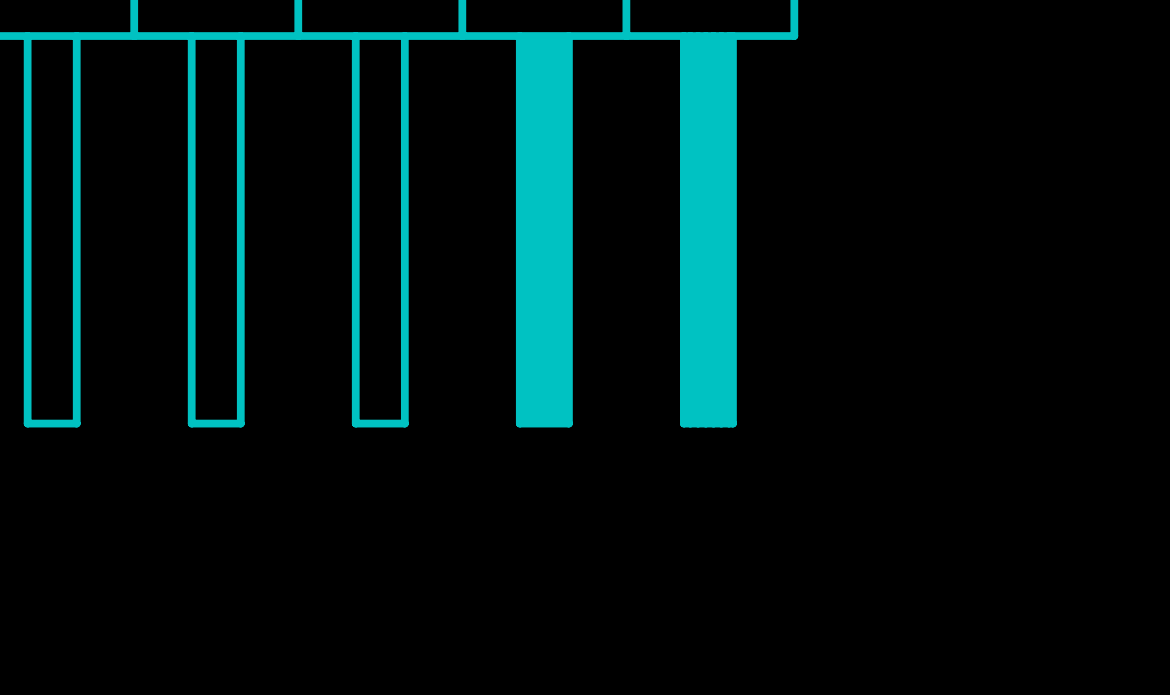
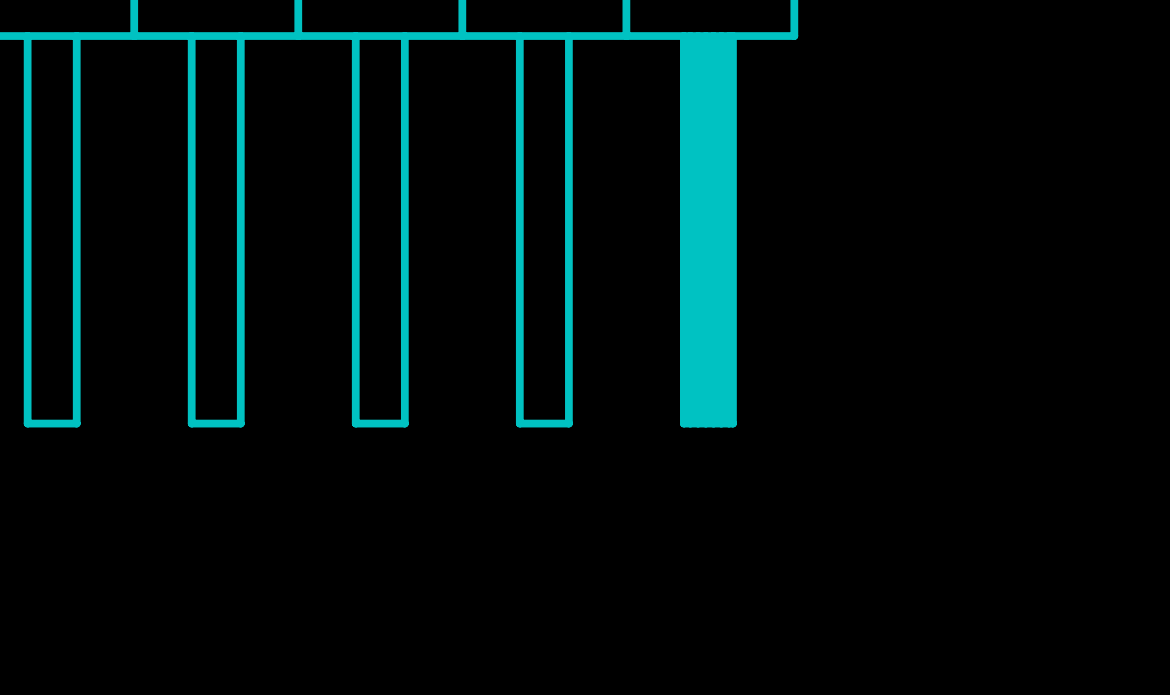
drawing: [516, 32, 573, 427] -> none

